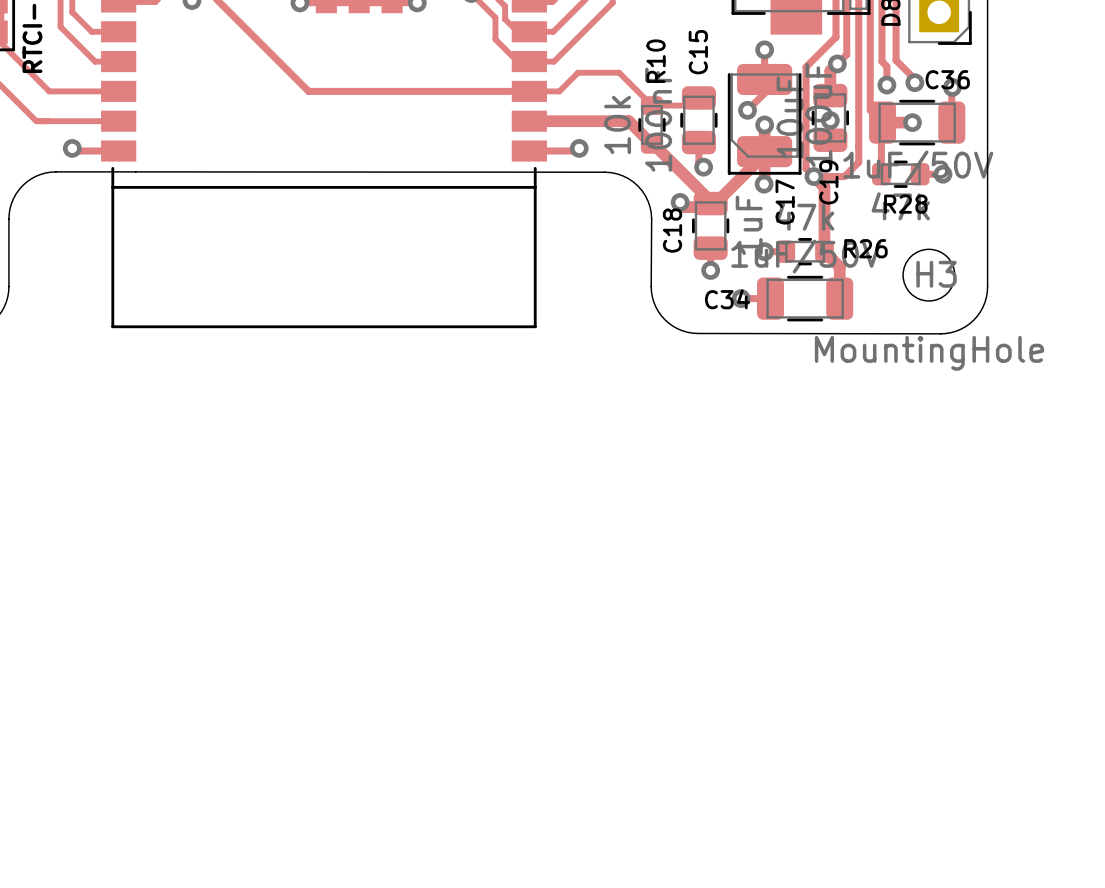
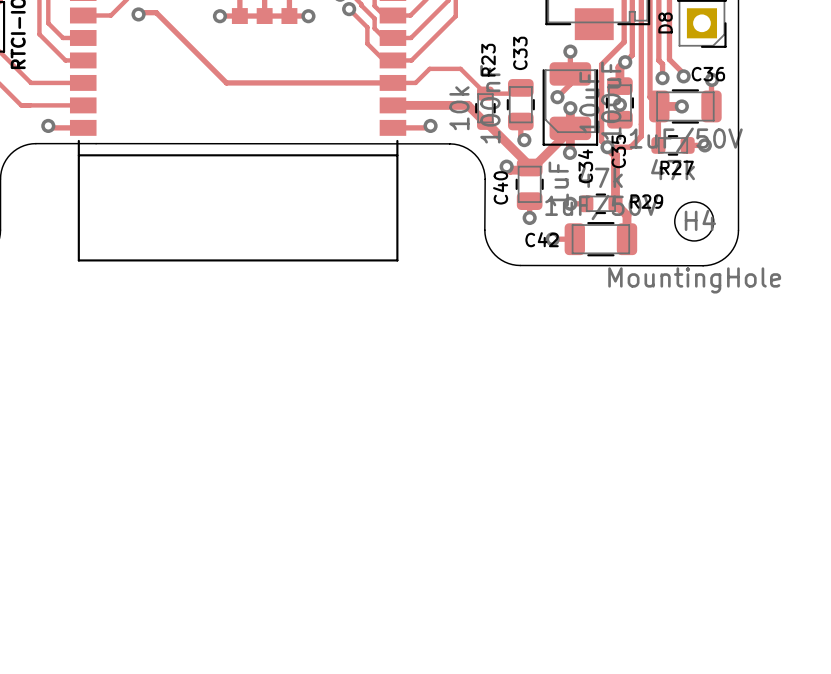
C15 name: C15 (698, 52) -> C33 (520, 53)
R10 name: R10 (656, 61) -> R23 (488, 60)
C19 name: C19 (828, 182) -> C35 (618, 151)
C17 name: C17 (785, 202) -> C34 (585, 166)
R28 name: R28 (905, 204) -> R27 (677, 167)
C18 name: C18 (672, 230) -> C40 (500, 187)
R26 name: R26 (865, 248) -> R29 (646, 201)
H3 name: H3 (936, 274) -> H4 (700, 220)
C34 name: C34 (727, 299) -> C42 (542, 239)

